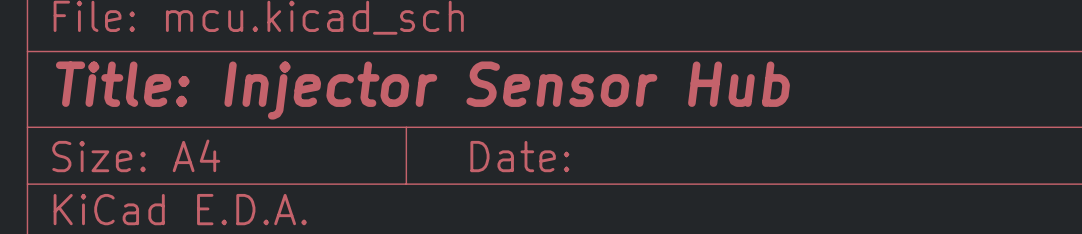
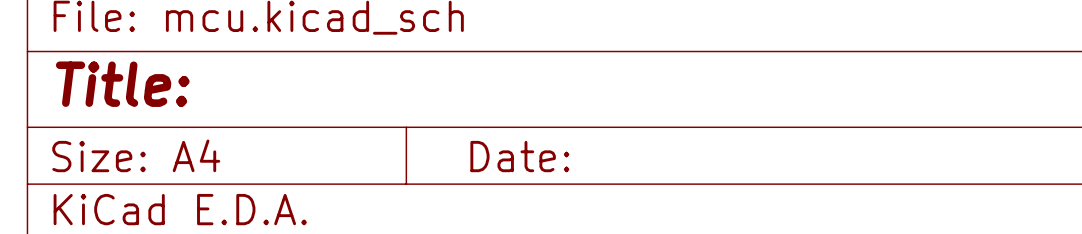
title block: Title: Injector Sensor Hub (422, 90) -> Title: (122, 84)

